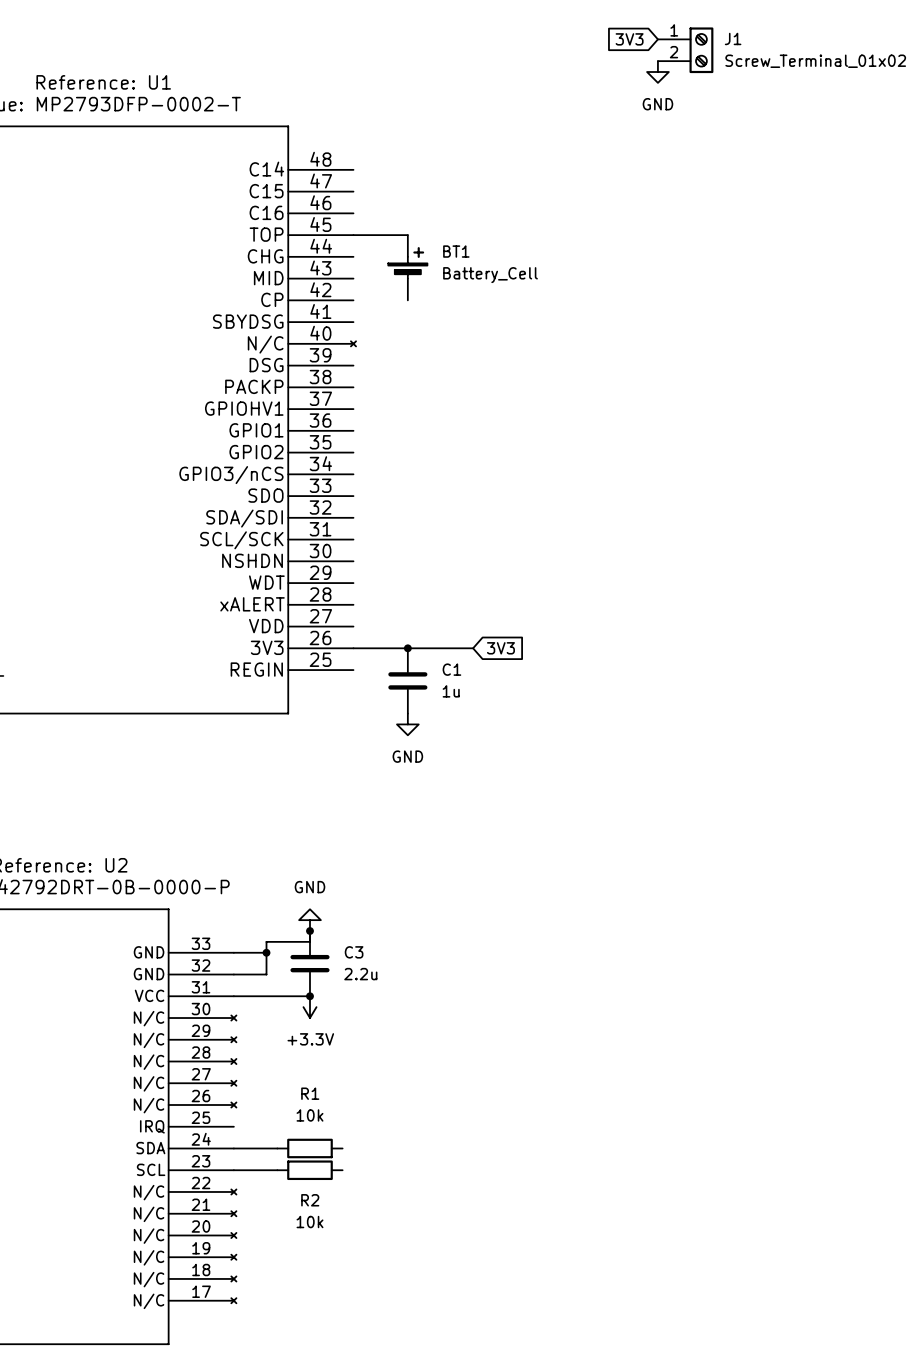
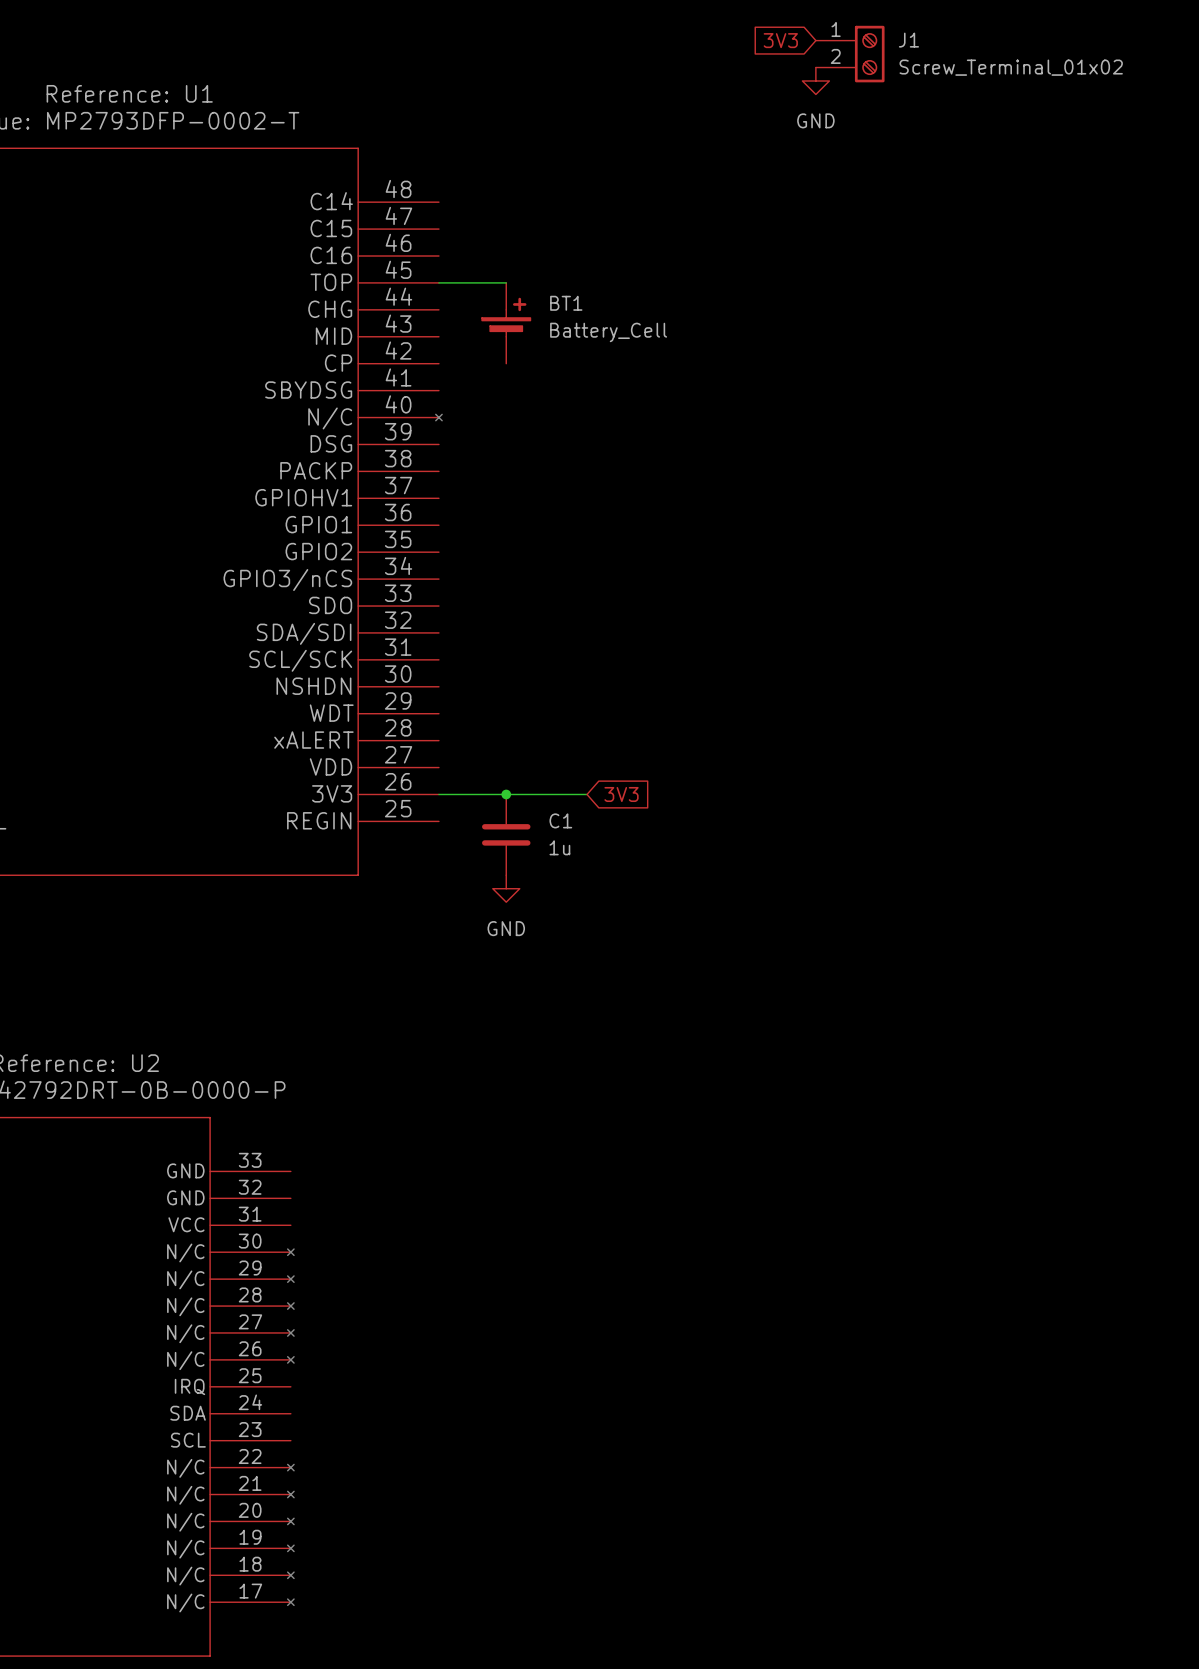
power symbol: GND (309, 920) -> none
wire: (309, 931) (309, 941) (266, 941) (266, 974) (233, 974) -> none
junction: (309, 931) -> none
wire: (233, 952) (266, 952) -> none
junction: (266, 952) -> none
C3: 2.2u (309, 963) -> none
wire: (233, 996) (309, 996) -> none
junction: (309, 996) -> none
power symbol: +3.3V (309, 1007) -> none
wire: (233, 1148) (277, 1148) -> none
R1: 10k (309, 1148) -> none
wire: (233, 1170) (277, 1170) -> none
R2: 10k (309, 1170) -> none

